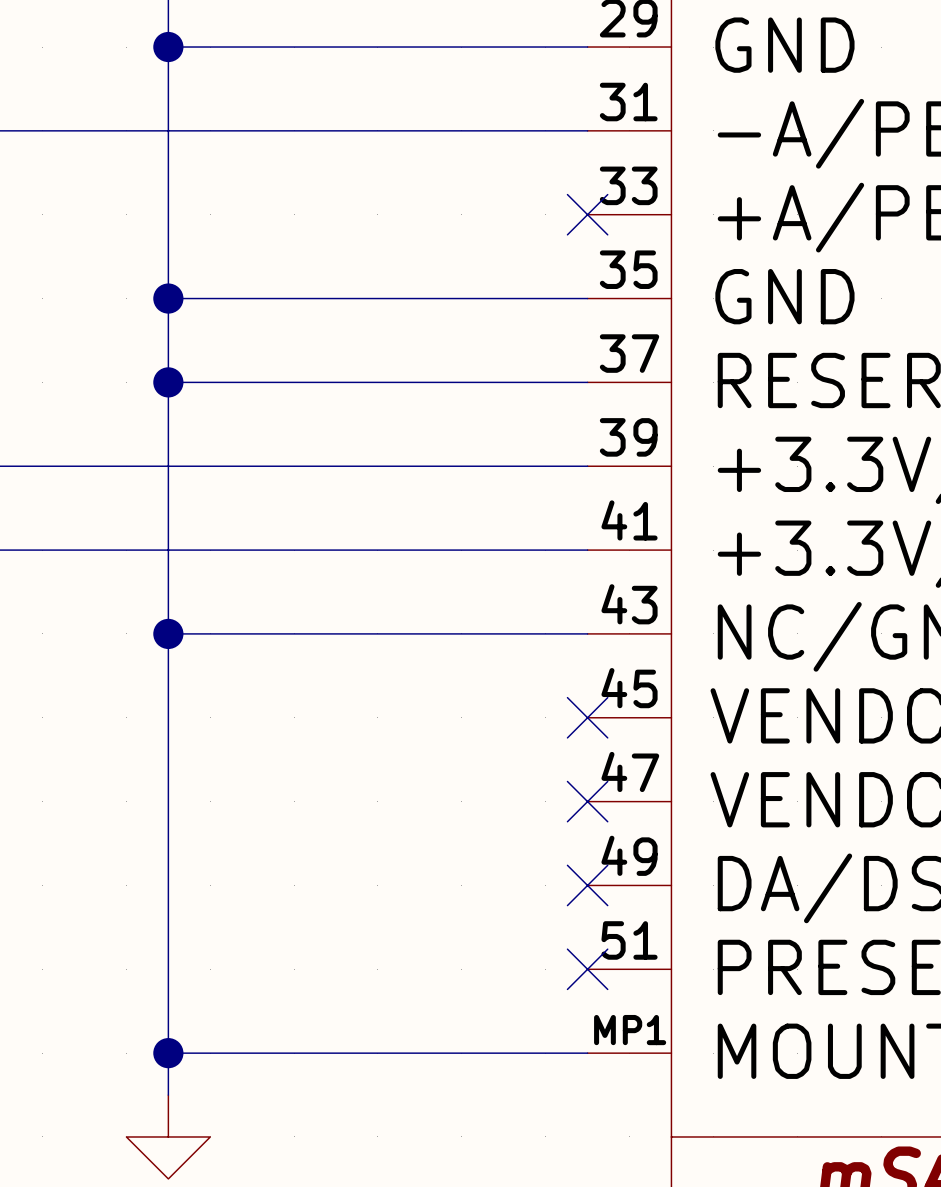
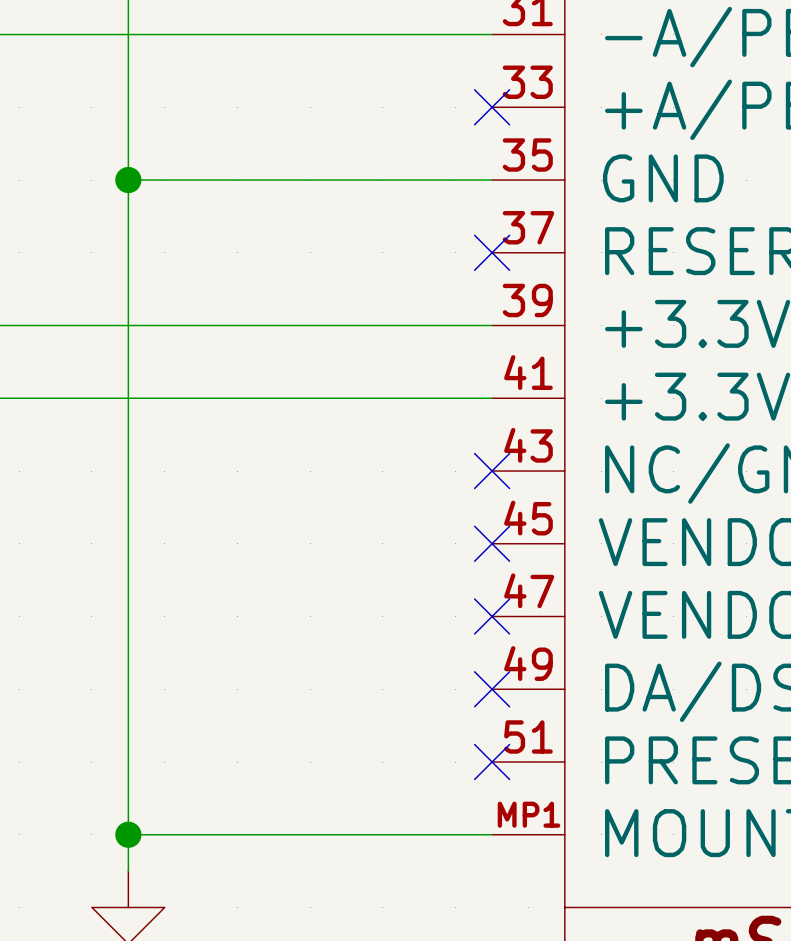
wire: (168, 382) (587, 382) -> none
junction: (168, 382) -> none
no-connect mark: none -> (492, 252)
wire: (168, 633) (587, 633) -> none
junction: (168, 633) -> none
no-connect mark: none -> (492, 471)

